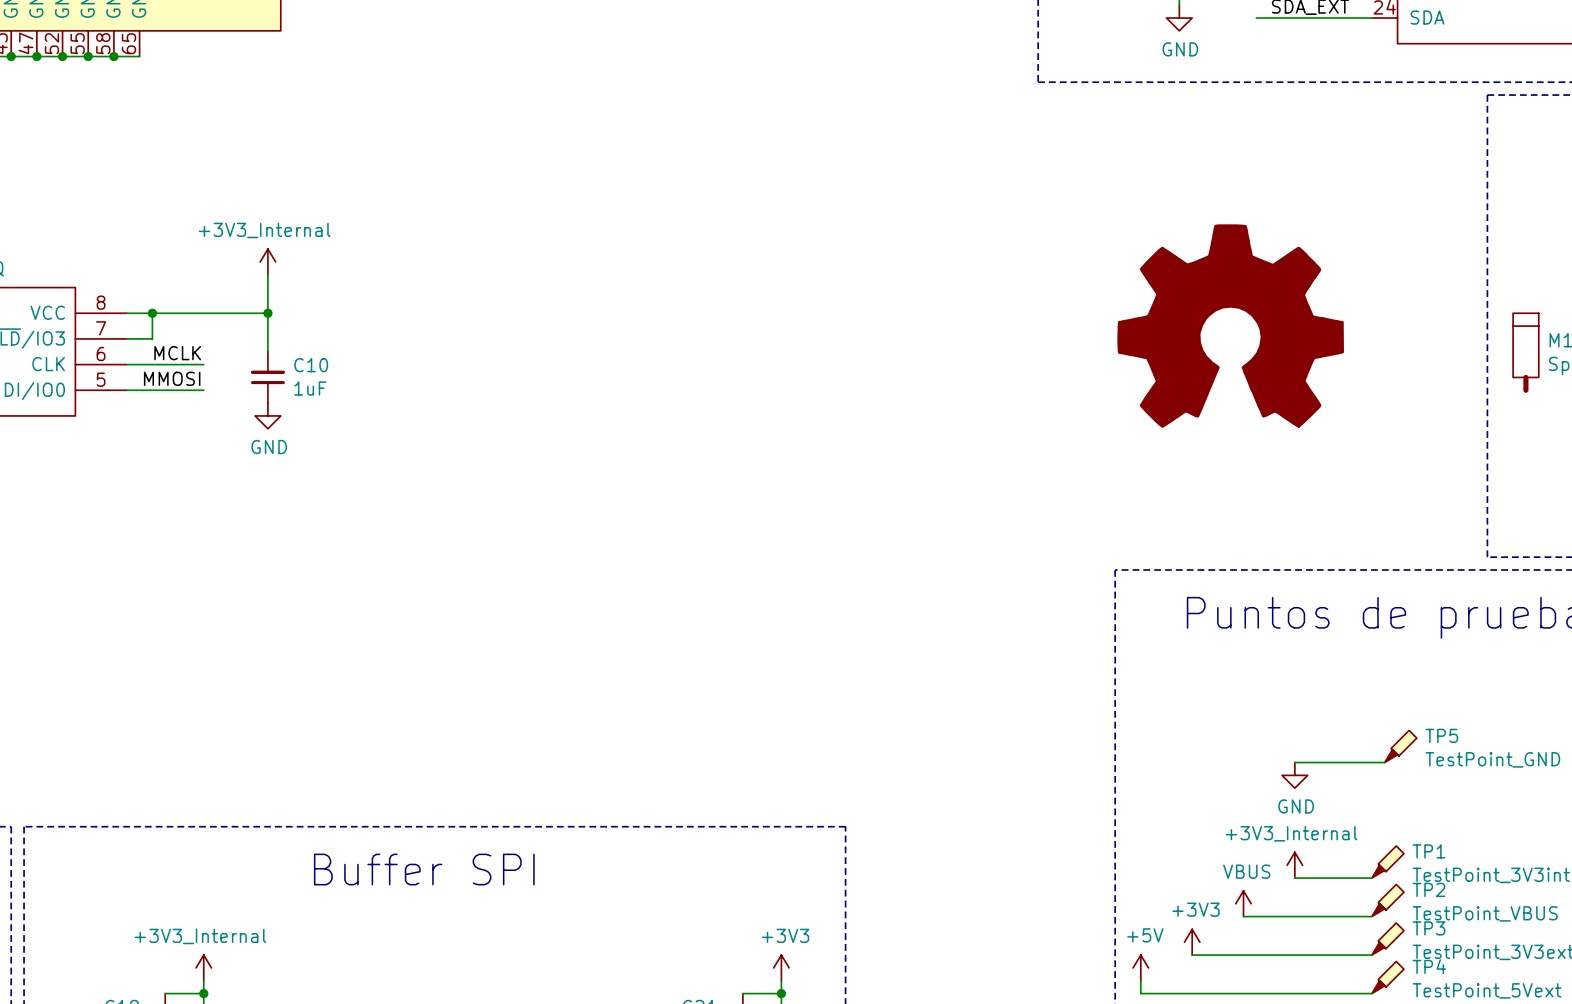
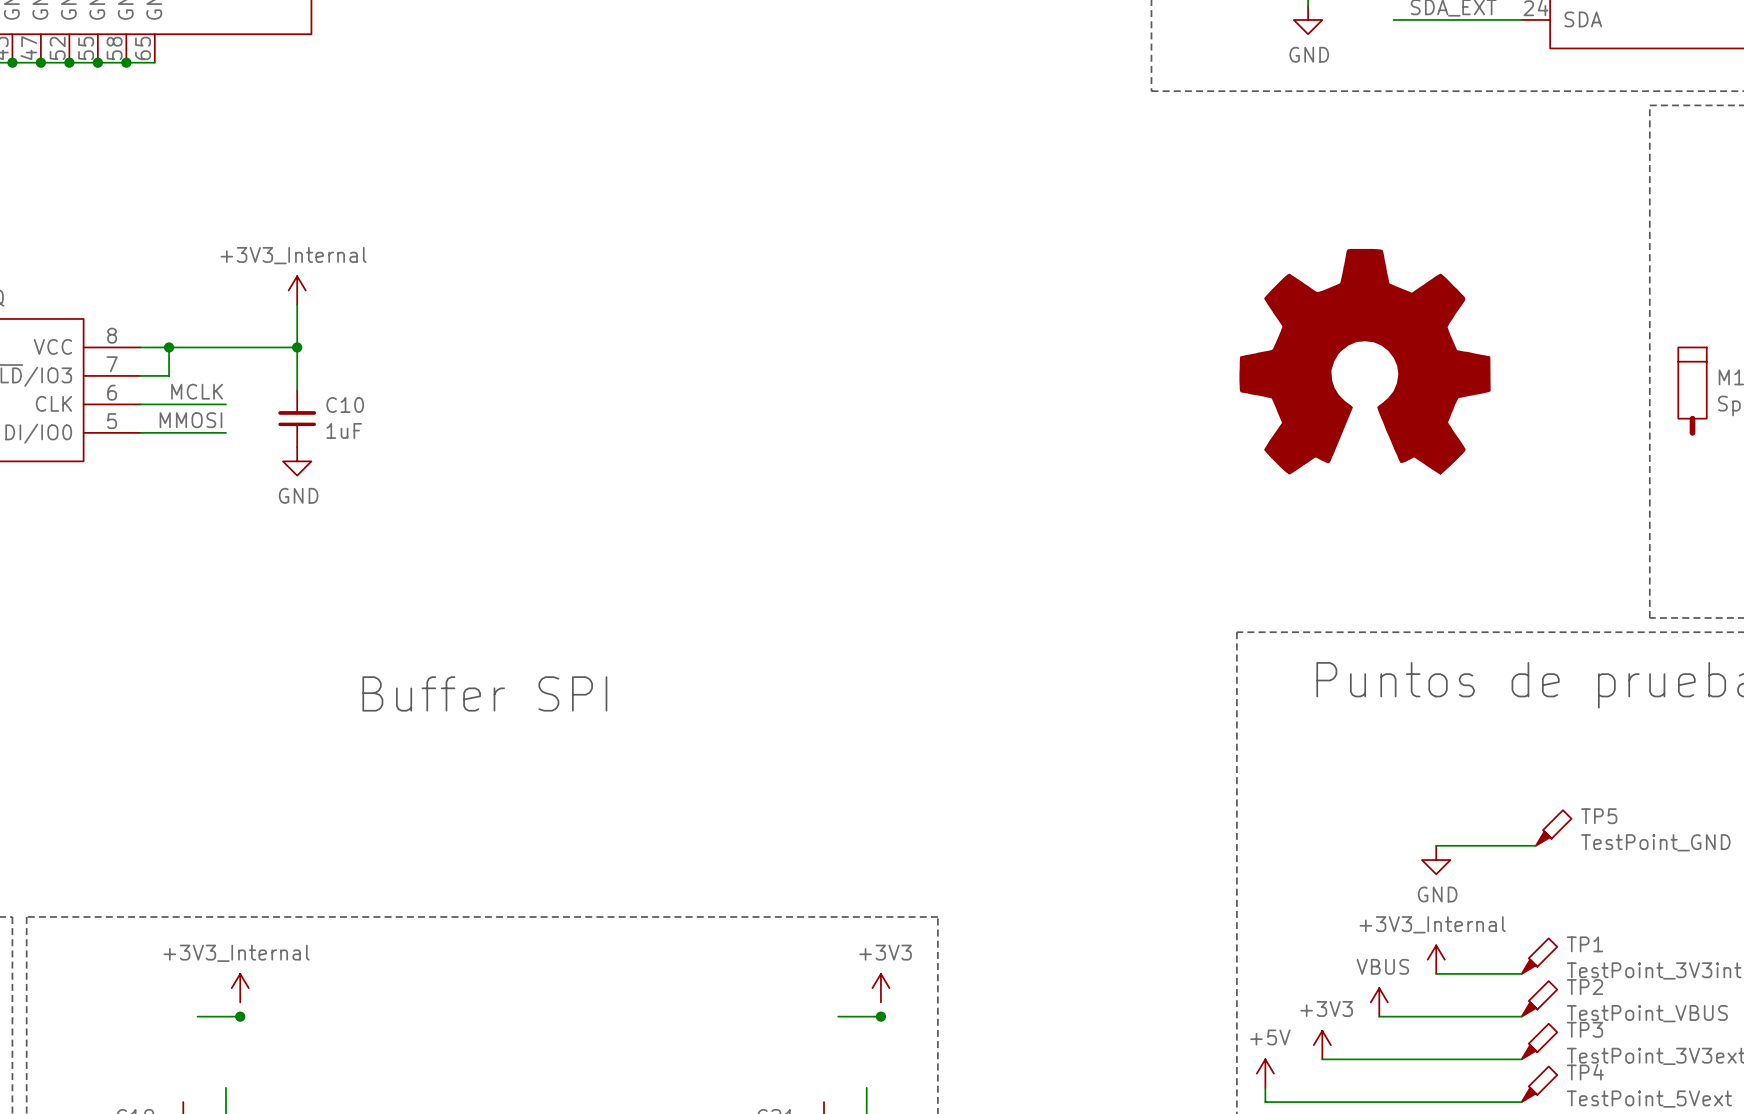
text position: Buffer SPI (424, 869) -> Buffer SPI (484, 693)
junction: none -> (240, 1016)
junction: none -> (880, 1016)
power symbol position: +3V3_Internal (203, 967) -> +3V3_Internal (240, 988)
power symbol position: +3V3 (781, 967) -> +3V3 (880, 988)
wire: (165, 993) (203, 993) -> (197, 1016) (240, 1016)
junction: (203, 993) -> none
wire: (742, 993) (781, 993) -> (838, 1016) (880, 1016)
junction: (781, 993) -> none

